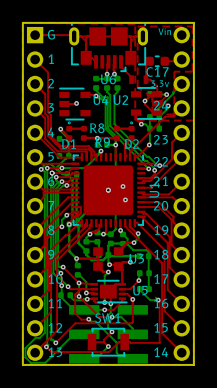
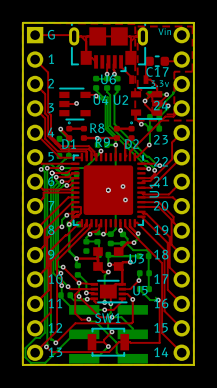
bottom track: (76, 174) (76, 222) (78, 224) -> none
bottom track: (108, 190) (78, 219) (78, 243) (91, 260) (103, 260) (108, 254) (108, 245) (110, 243) -> none

